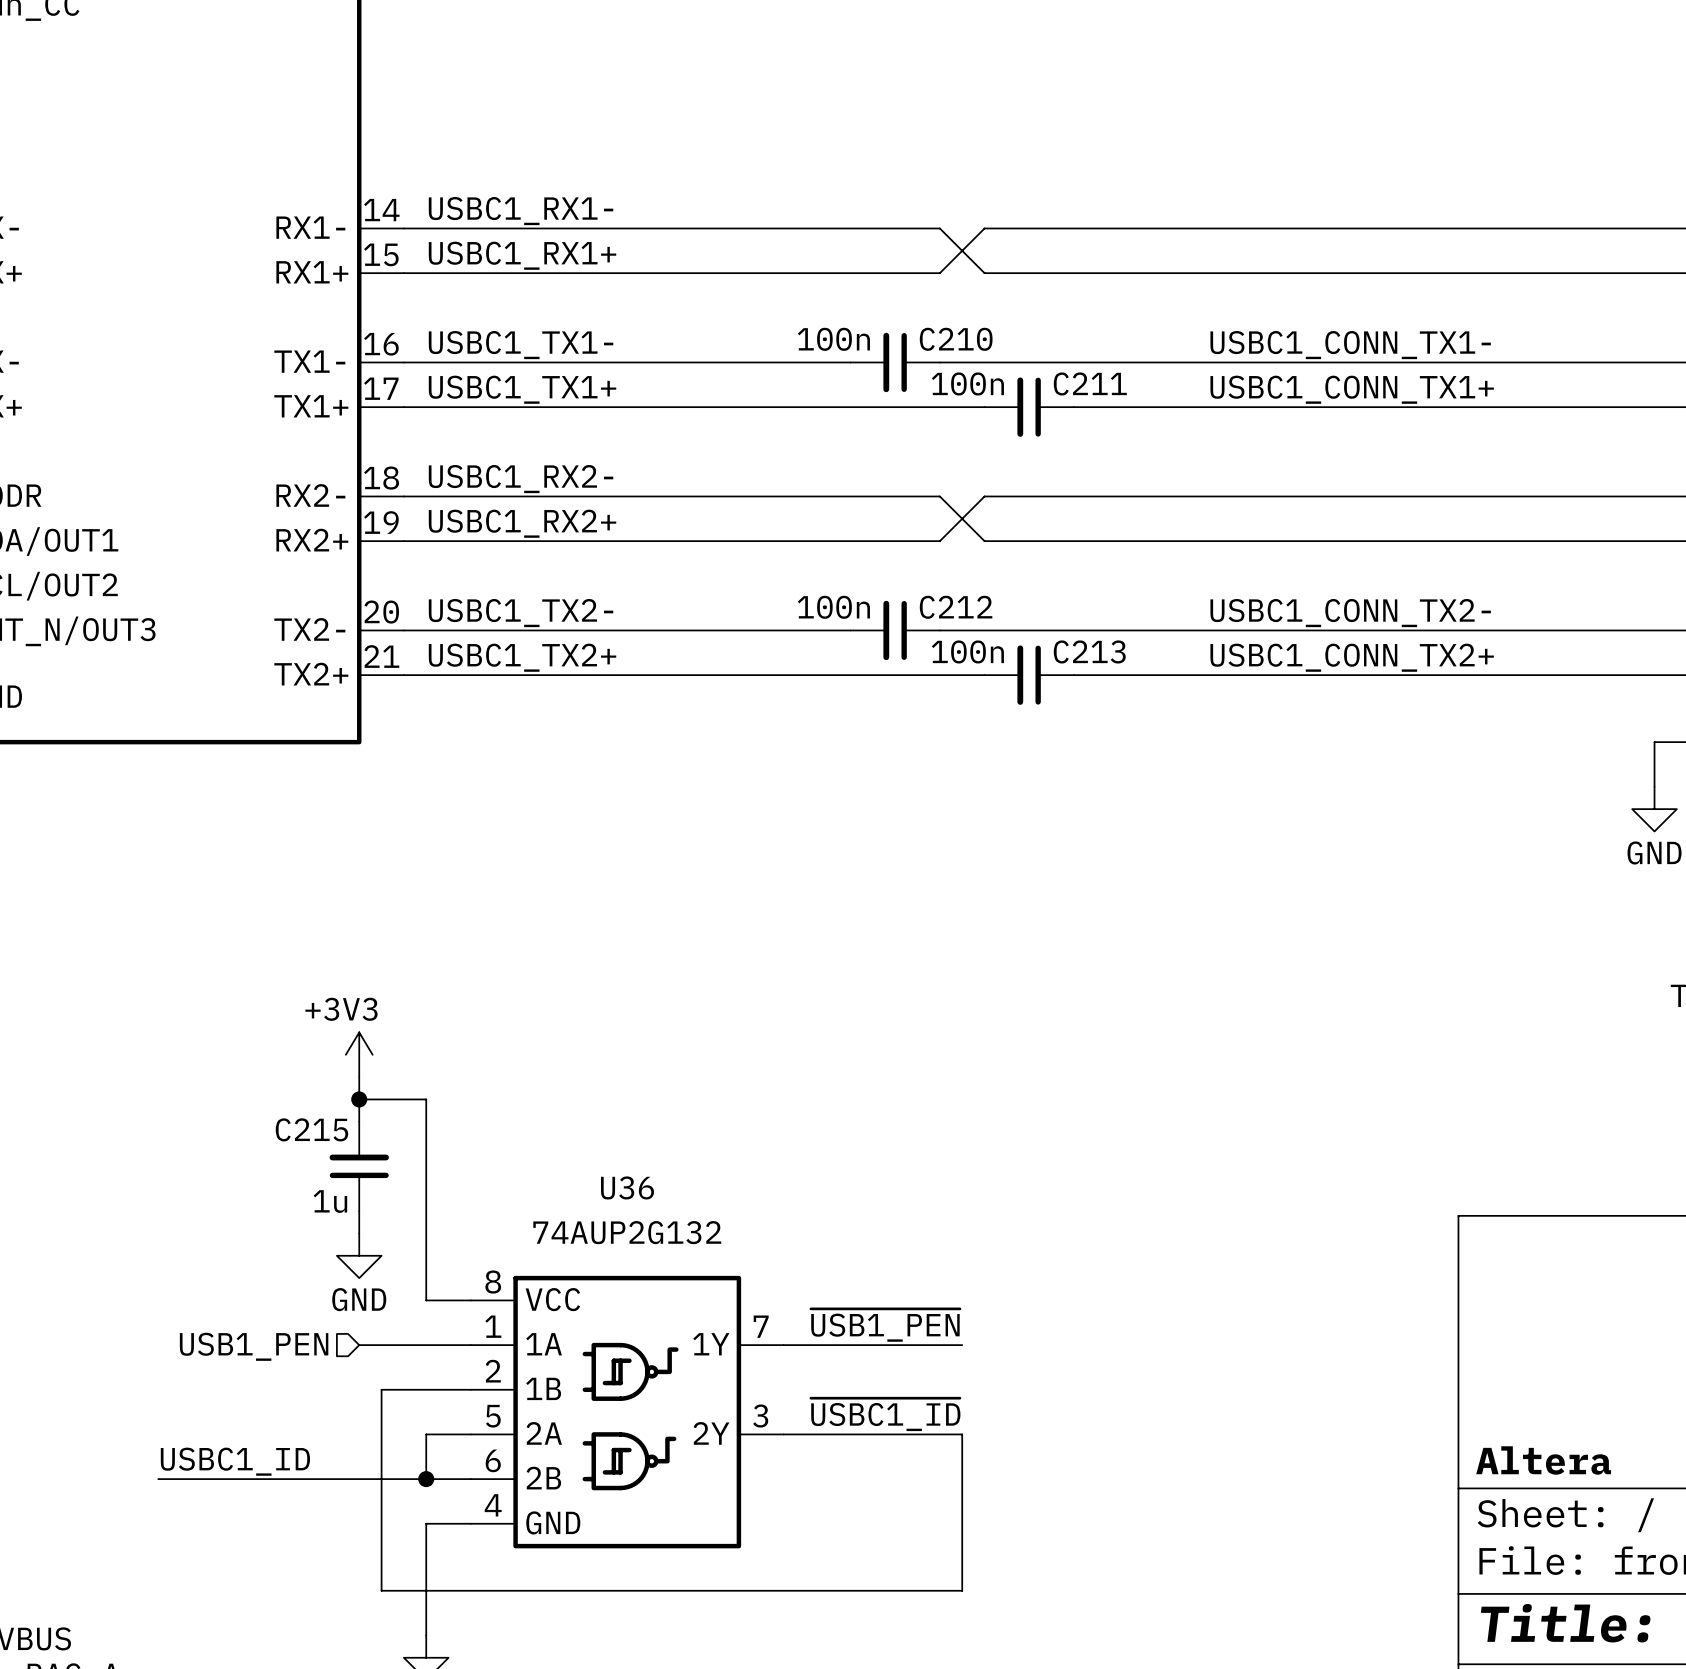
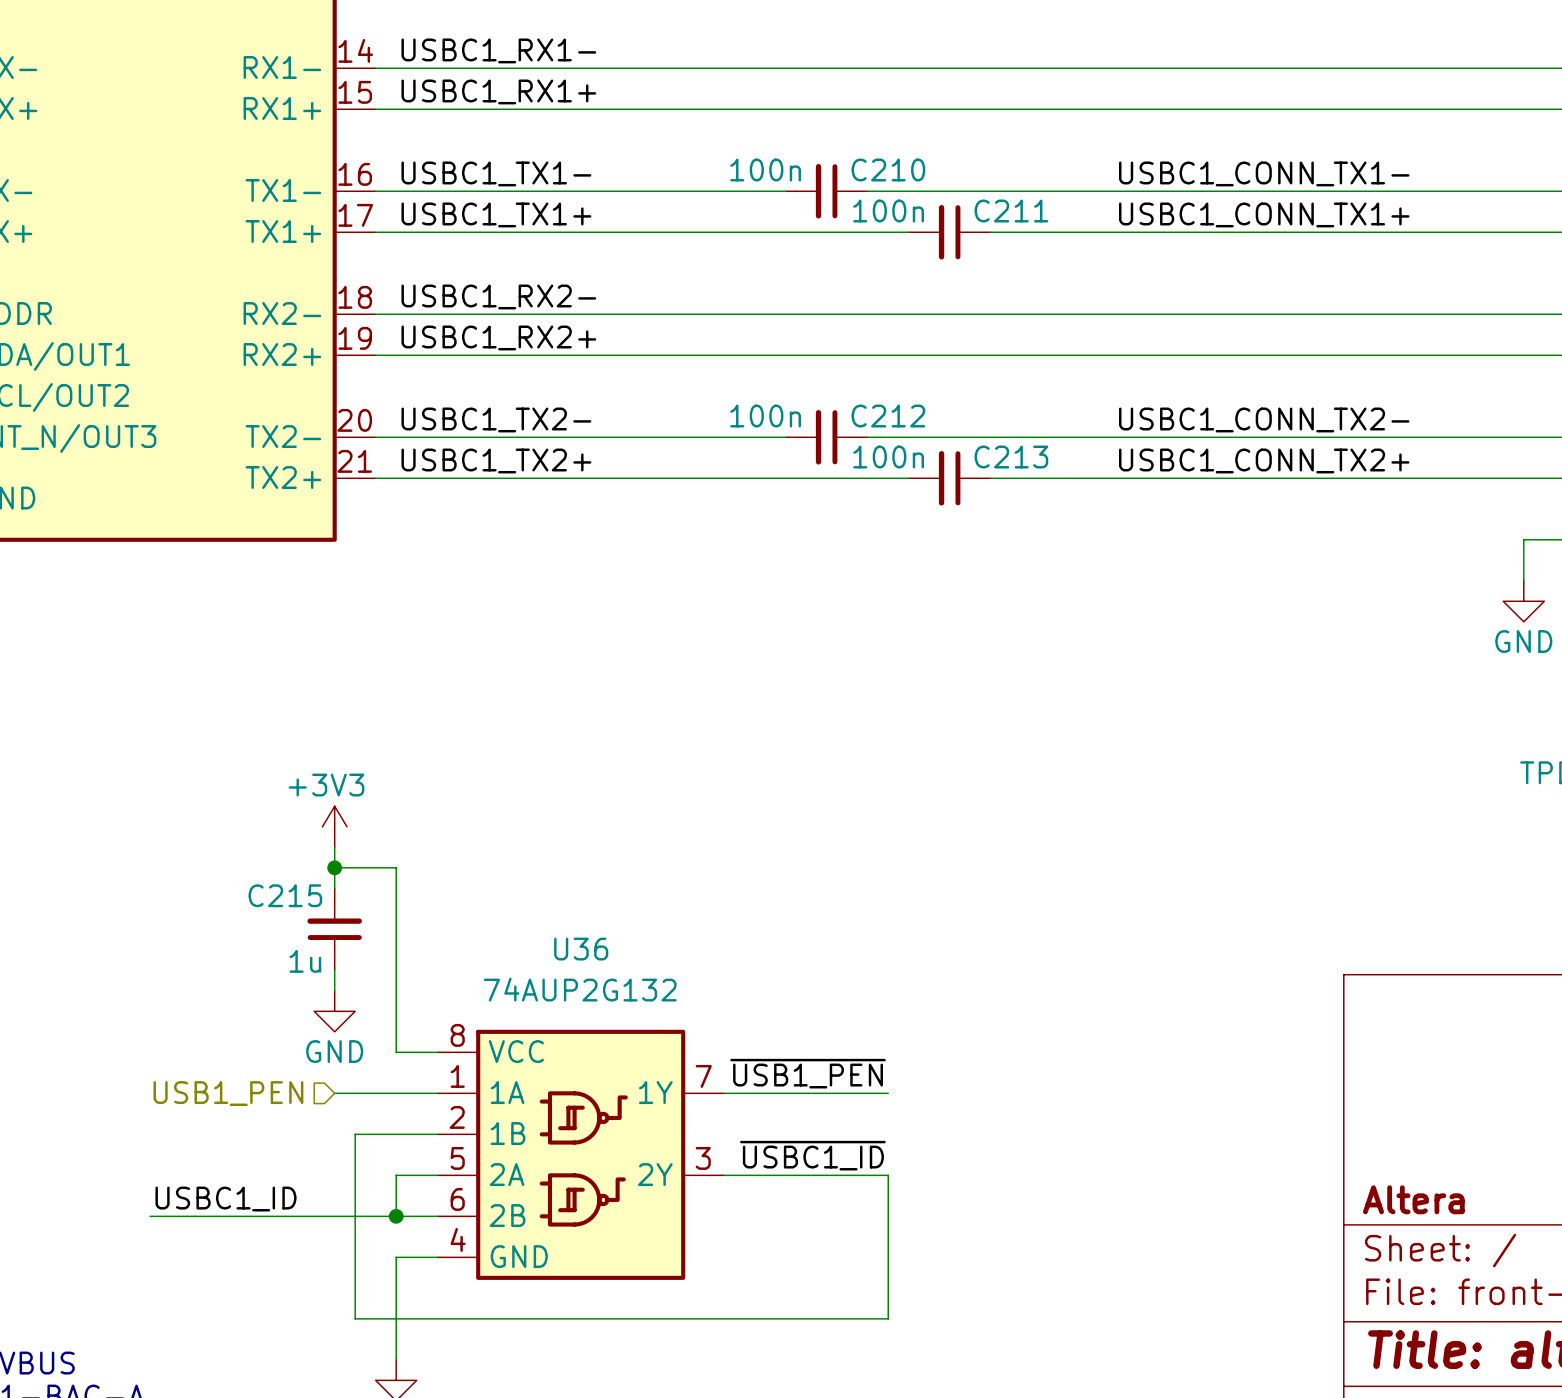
wire: (939, 228) (984, 273) -> (867, 68) (908, 68)
wire: (984, 228) (939, 273) -> (908, 109) (867, 109)
wire: (939, 496) (984, 541) -> (867, 314) (908, 314)
wire: (984, 496) (939, 541) -> (908, 355) (867, 355)

